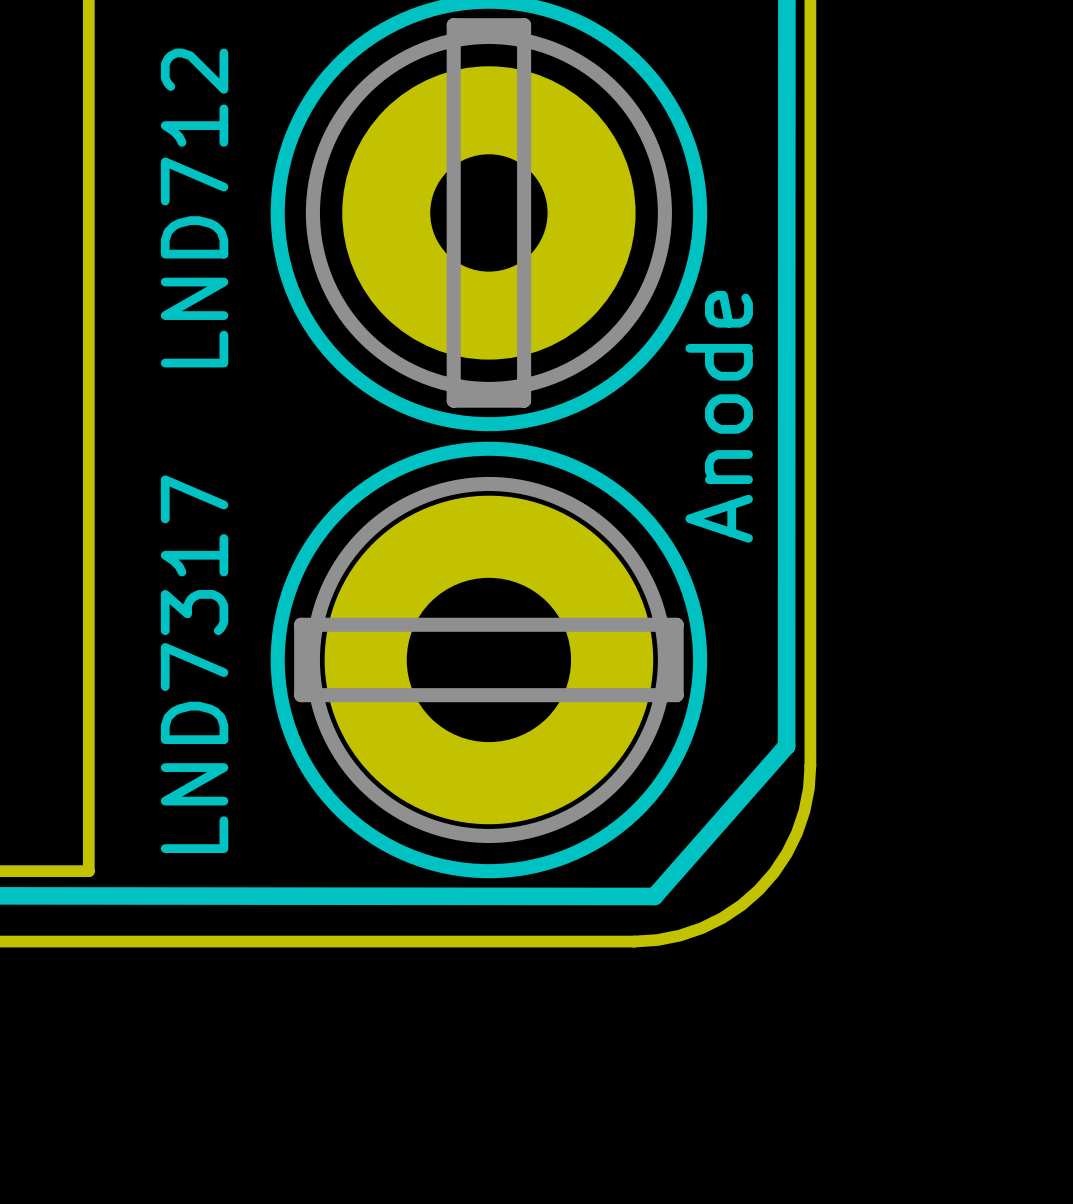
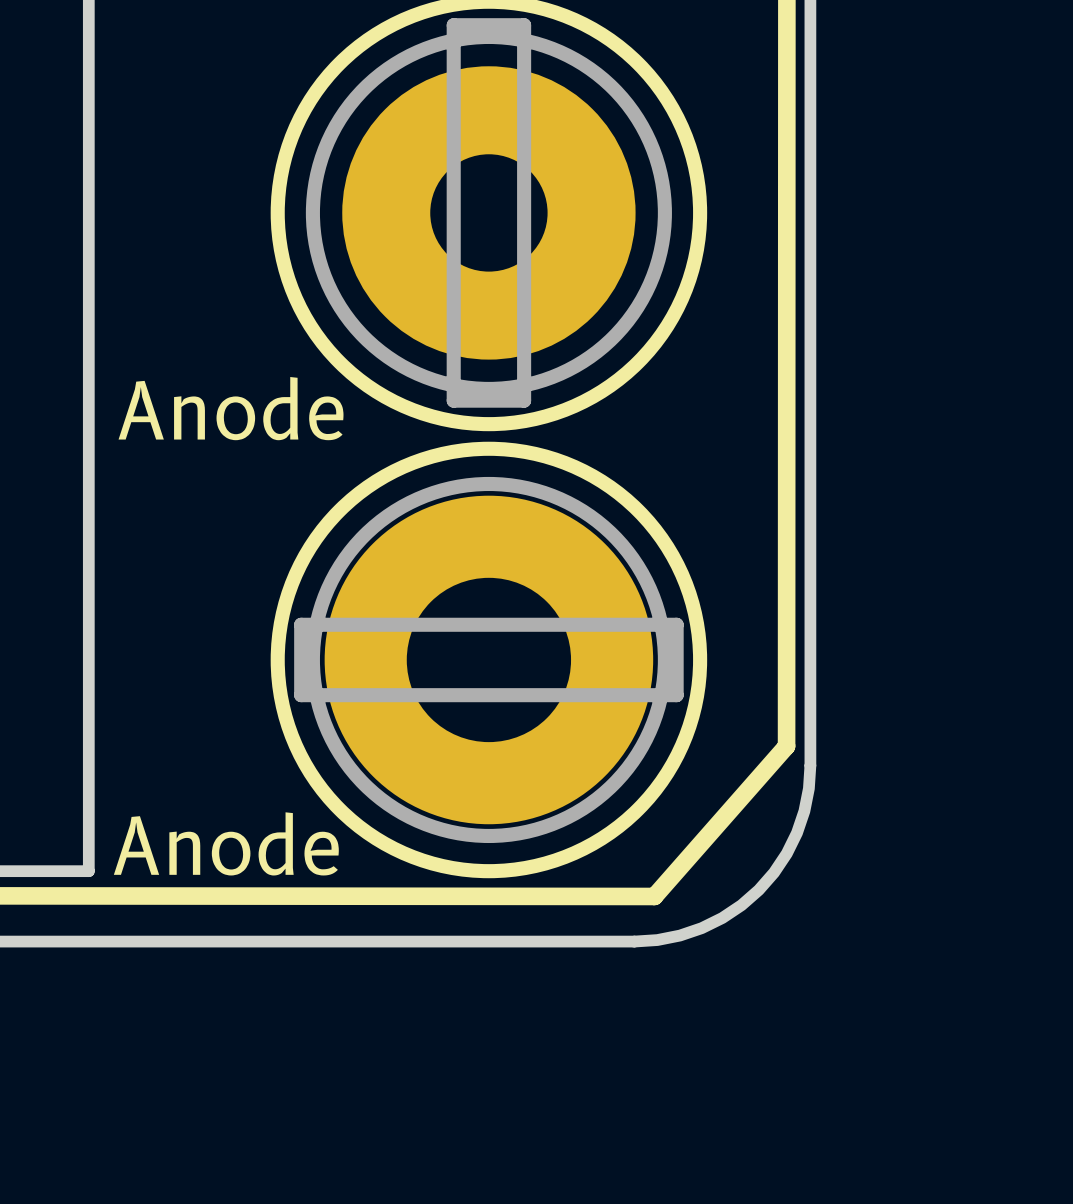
part value: LND712 (194, 208) -> Anode (231, 408)
text: Anode (719, 416) -> none
part value: LND7317 (194, 664) -> Anode (226, 843)

